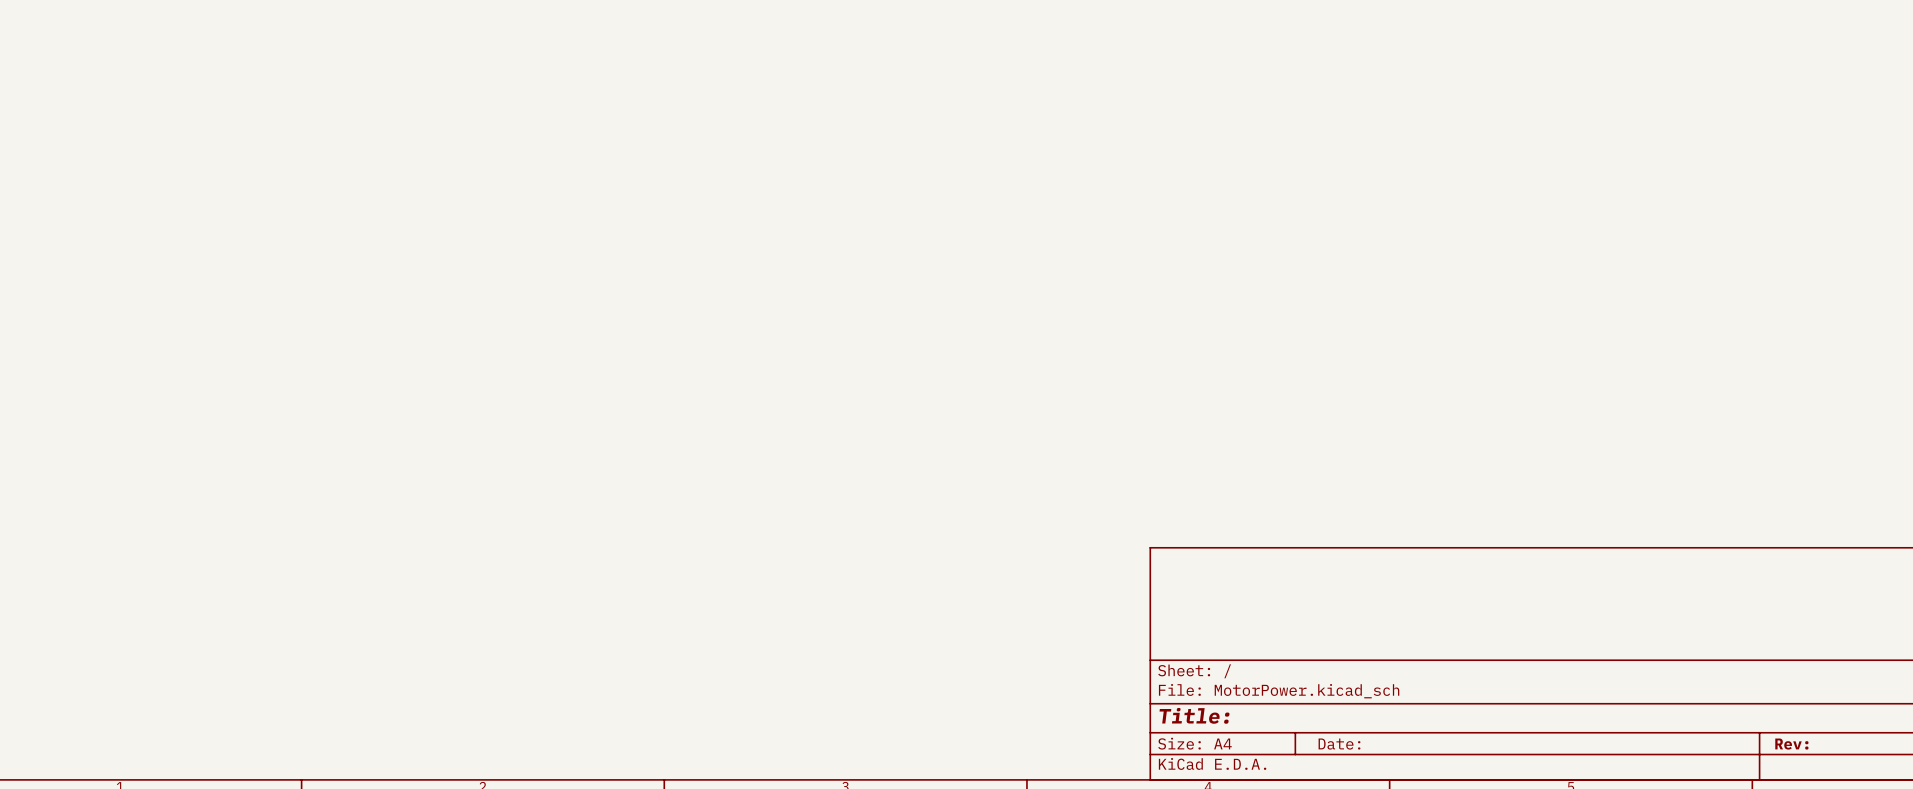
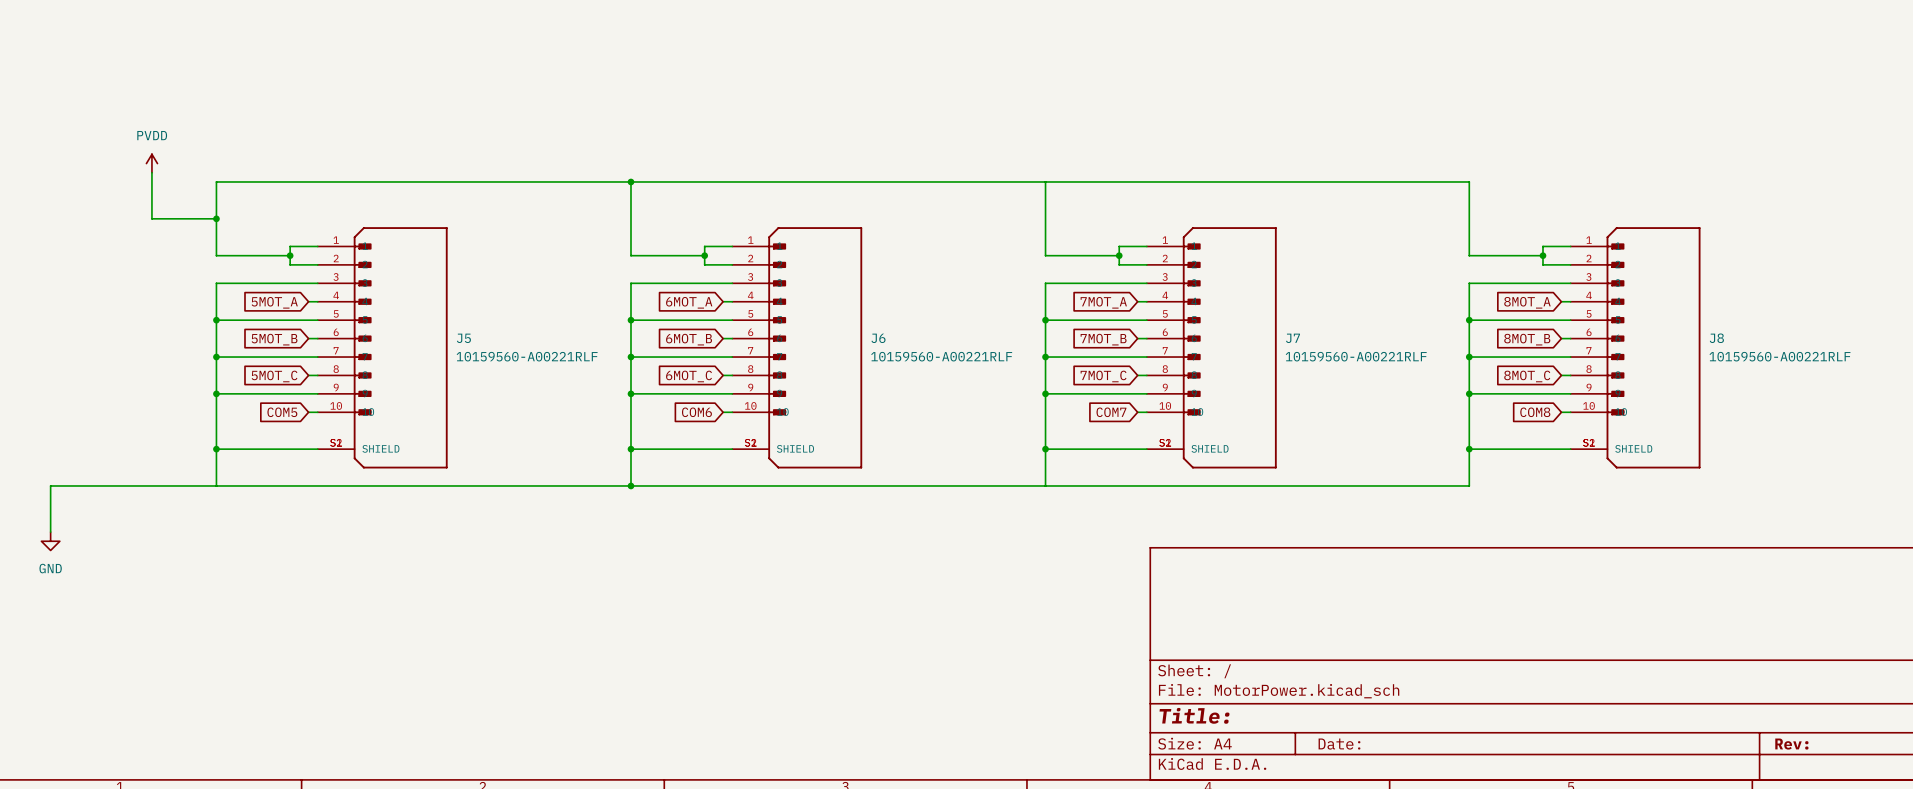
power symbol: none -> PVDD (151, 163)
wire: none -> (151, 172) (151, 218) (216, 218)
wire: none -> (630, 181) (630, 255) (704, 255)
junction: none -> (630, 181)
wire: none -> (1045, 181) (1045, 255) (1119, 255)
junction: none -> (216, 218)
wire: none -> (317, 246) (290, 246) (290, 264) (317, 264)
wire: none -> (732, 246) (704, 246) (704, 264) (732, 264)
wire: none -> (1146, 246) (1119, 246) (1119, 264) (1146, 264)
wire: none -> (1570, 246) (1542, 246) (1542, 264) (1570, 264)
wire: none -> (290, 255) (216, 255) (216, 181) (1469, 181) (1469, 255) (1542, 255)
junction: none -> (290, 255)
junction: none -> (704, 255)
junction: none -> (1119, 255)
junction: none -> (1542, 255)
wire: none -> (317, 283) (216, 283) (216, 485)
wire: none -> (732, 283) (630, 283) (630, 485)
wire: none -> (1146, 283) (1045, 283) (1045, 485)
wire: none -> (1570, 283) (1469, 283) (1469, 485) (50, 485) (50, 532)
wire: none -> (308, 301) (317, 301)
wire: none -> (723, 301) (732, 301)
wire: none -> (1137, 301) (1146, 301)
wire: none -> (1561, 301) (1570, 301)
global label: none -> 5MOT_A (274, 302)
global label: none -> 6MOT_A (689, 302)
global label: none -> 7MOT_A (1103, 302)
global label: none -> 8MOT_A (1527, 302)
wire: none -> (216, 320) (317, 320)
junction: none -> (216, 320)
wire: none -> (630, 320) (732, 320)
junction: none -> (630, 320)
wire: none -> (1045, 320) (1146, 320)
junction: none -> (1045, 320)
wire: none -> (1469, 320) (1570, 320)
junction: none -> (1469, 320)
wire: none -> (308, 338) (317, 338)
wire: none -> (723, 338) (732, 338)
wire: none -> (1137, 338) (1146, 338)
wire: none -> (1561, 338) (1570, 338)
global label: none -> 5MOT_B (274, 339)
global label: none -> 6MOT_B (689, 339)
global label: none -> 7MOT_B (1103, 339)
global label: none -> 8MOT_B (1527, 339)
J5: none -> 10159560-A00221RLF (382, 347)
J6: none -> 10159560-A00221RLF (797, 347)
J7: none -> 10159560-A00221RLF (1211, 347)
J8: none -> 10159560-A00221RLF (1635, 347)
wire: none -> (216, 357) (317, 357)
junction: none -> (216, 357)
wire: none -> (630, 357) (732, 357)
junction: none -> (630, 357)
wire: none -> (1045, 357) (1146, 357)
junction: none -> (1045, 357)
wire: none -> (1469, 357) (1570, 357)
junction: none -> (1469, 357)
wire: none -> (308, 375) (317, 375)
wire: none -> (723, 375) (732, 375)
wire: none -> (1137, 375) (1146, 375)
wire: none -> (1561, 375) (1570, 375)
global label: none -> 5MOT_C (274, 376)
global label: none -> 6MOT_C (689, 376)
global label: none -> 7MOT_C (1103, 376)
global label: none -> 8MOT_C (1527, 376)
wire: none -> (216, 393) (317, 393)
junction: none -> (216, 393)
wire: none -> (630, 393) (732, 393)
junction: none -> (630, 393)
wire: none -> (1045, 393) (1146, 393)
junction: none -> (1045, 393)
wire: none -> (1469, 393) (1570, 393)
junction: none -> (1469, 393)
global label: none -> COM5 (282, 412)
wire: none -> (308, 412) (317, 412)
global label: none -> COM6 (696, 412)
wire: none -> (723, 412) (732, 412)
global label: none -> COM7 (1111, 412)
wire: none -> (1137, 412) (1146, 412)
global label: none -> COM8 (1535, 412)
wire: none -> (1561, 412) (1570, 412)
wire: none -> (216, 449) (317, 449)
junction: none -> (216, 449)
wire: none -> (630, 449) (732, 449)
junction: none -> (630, 449)
wire: none -> (1045, 449) (1146, 449)
junction: none -> (1045, 449)
wire: none -> (1469, 449) (1570, 449)
junction: none -> (1469, 449)
junction: none -> (630, 485)
power symbol: none -> GND (50, 541)

